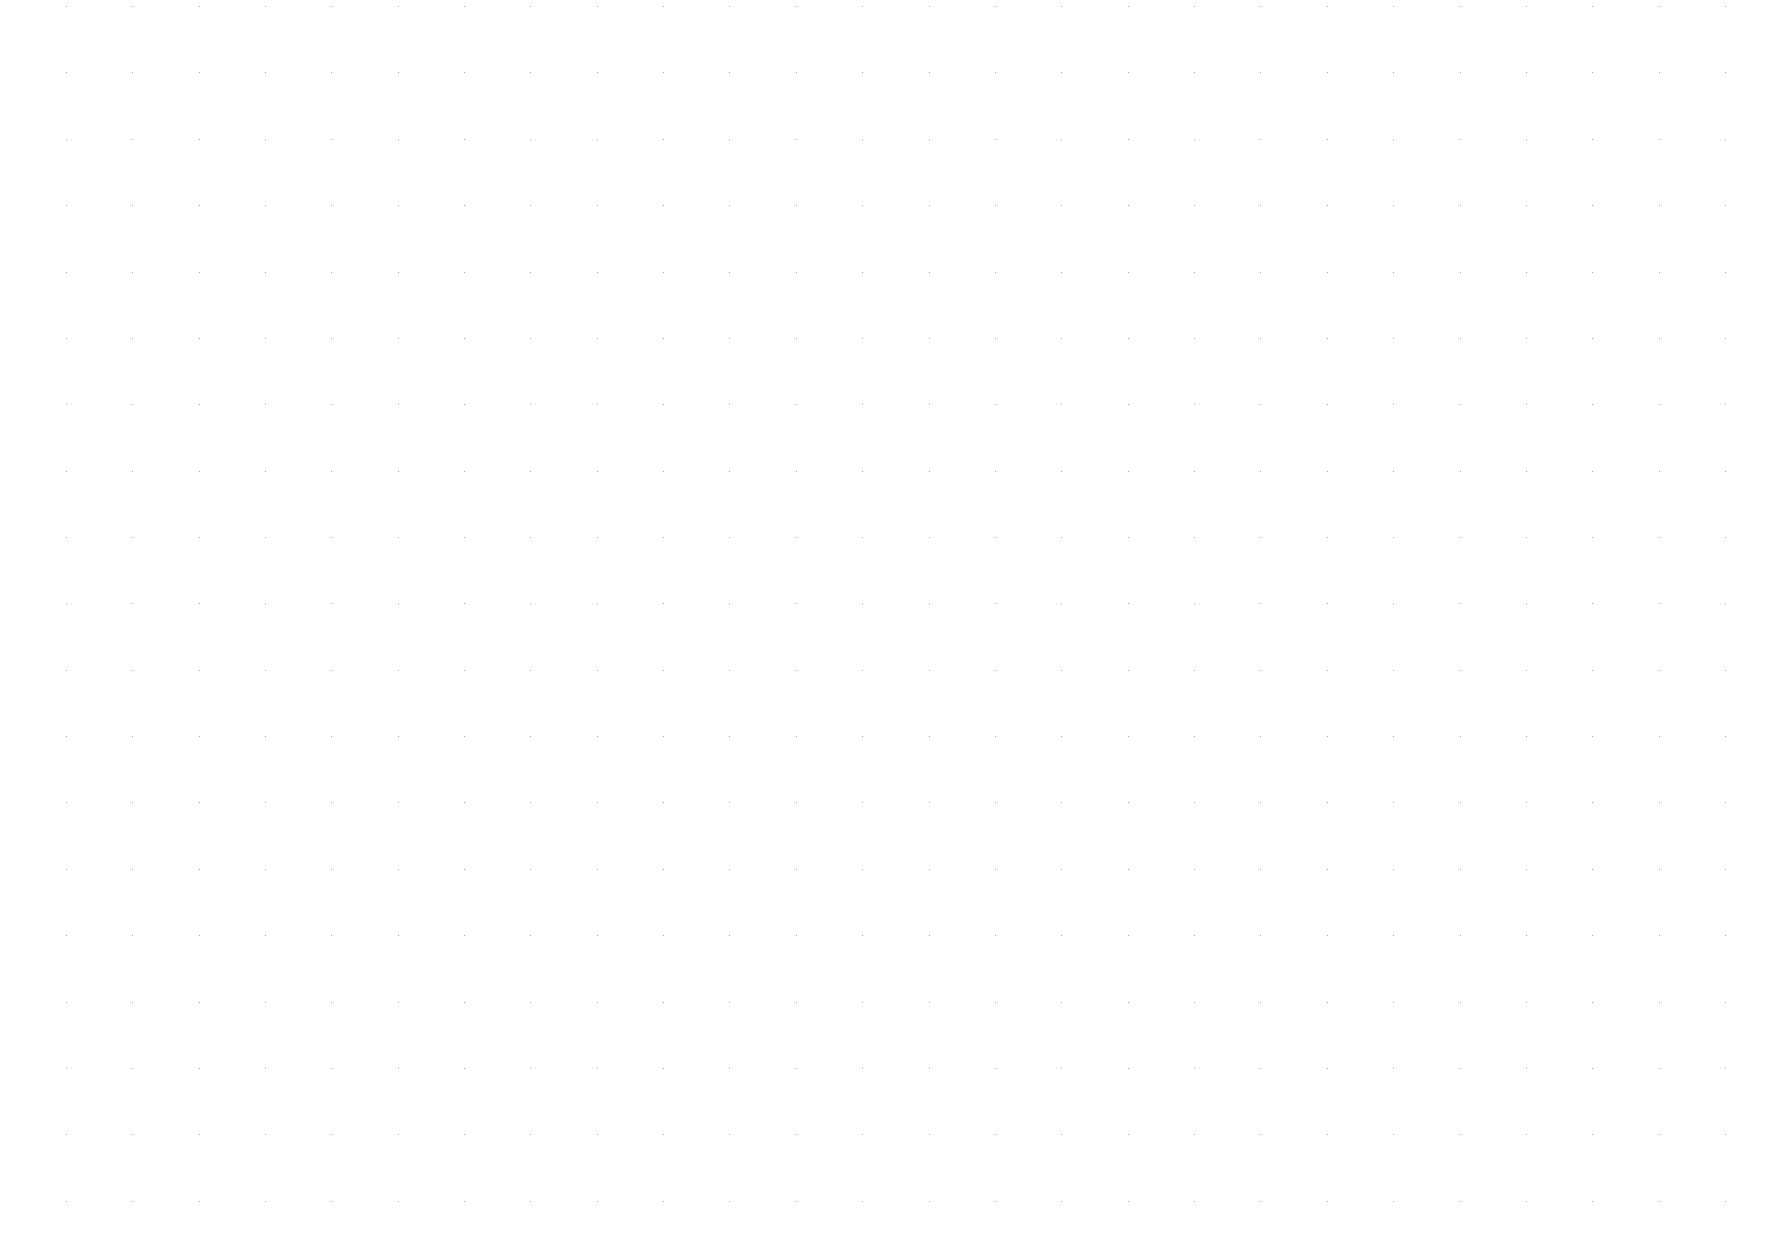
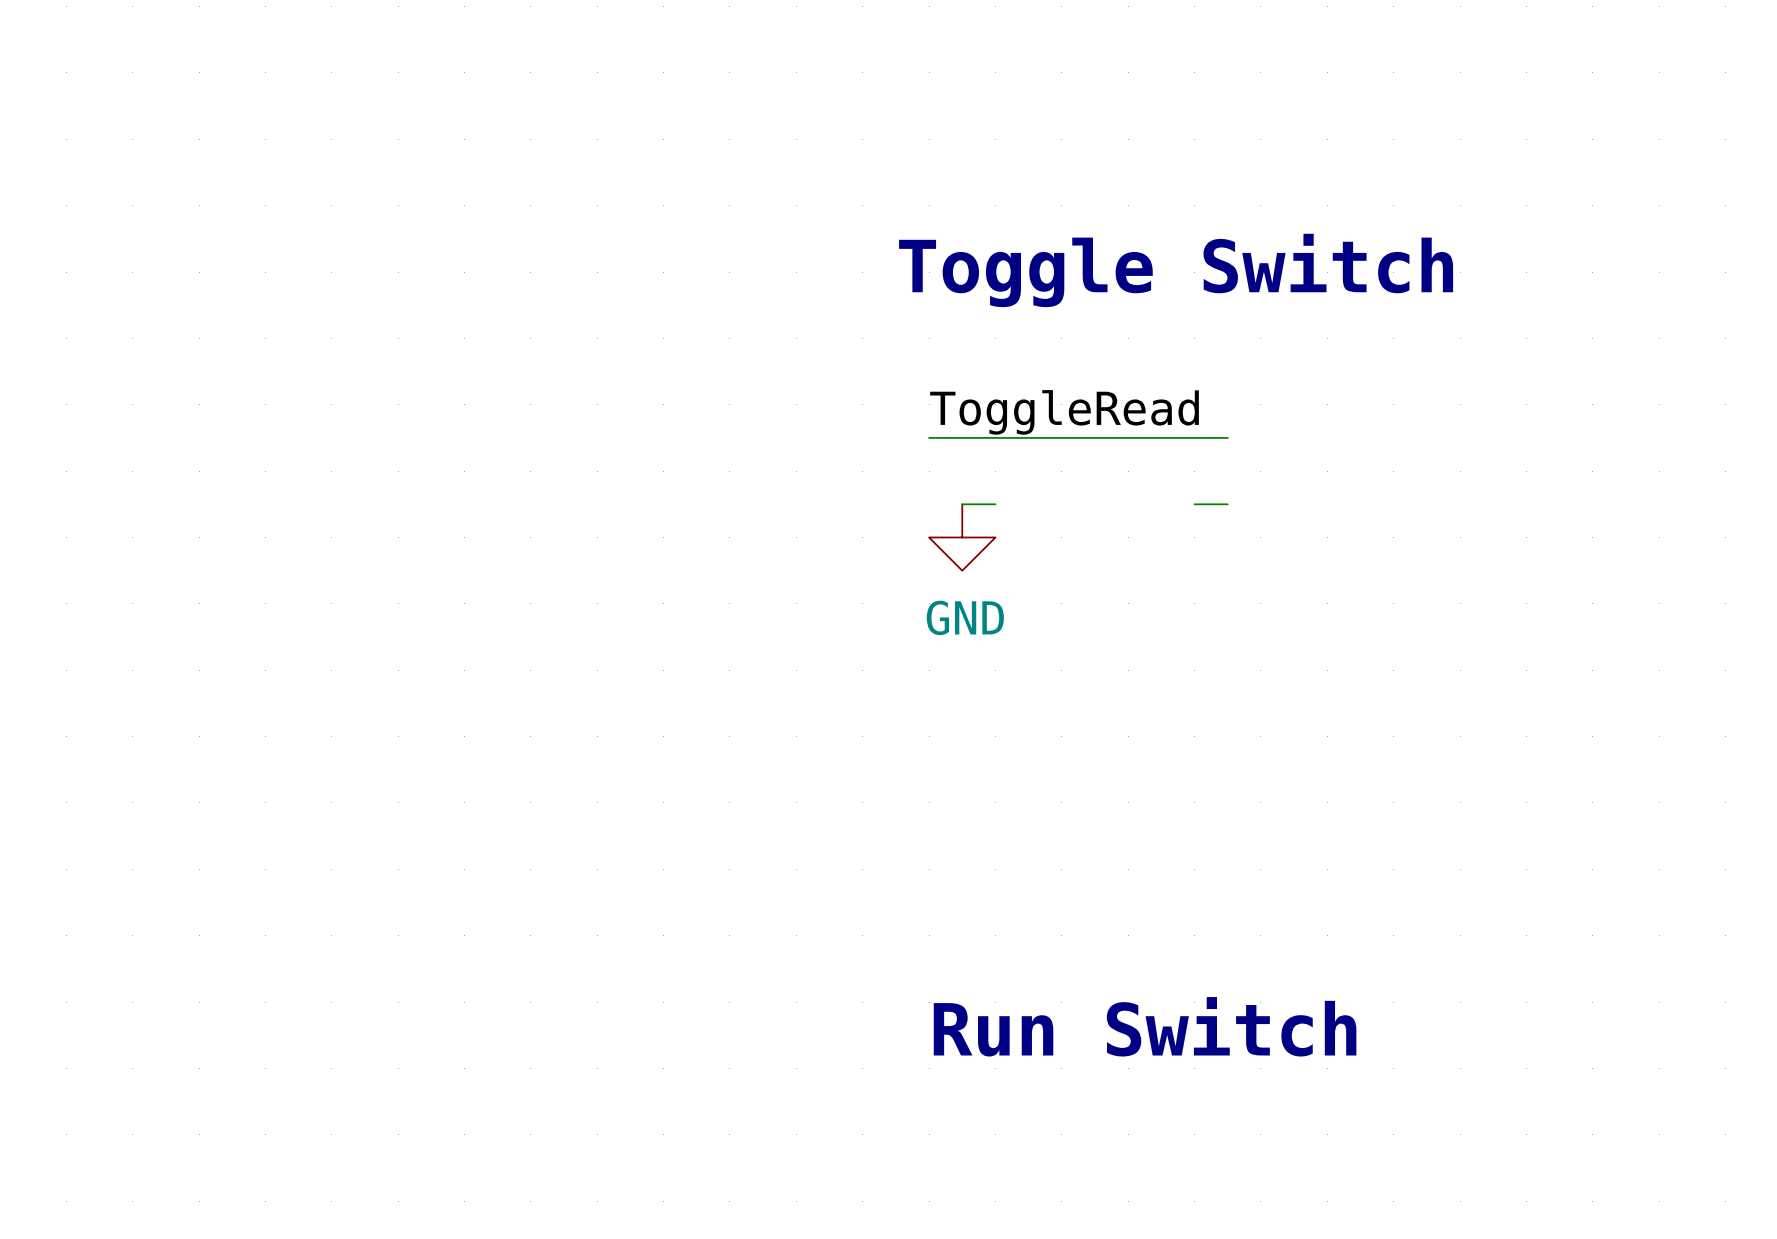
text: none -> Toggle Switch (1176, 270)
label: none -> ToggleRead (1064, 412)
wire: none -> (929, 437) (1227, 437)
wire: none -> (962, 504) (995, 504)
wire: none -> (1194, 504) (1227, 504)
power symbol: none -> GND (962, 537)
text: none -> Run Switch (1145, 1026)

